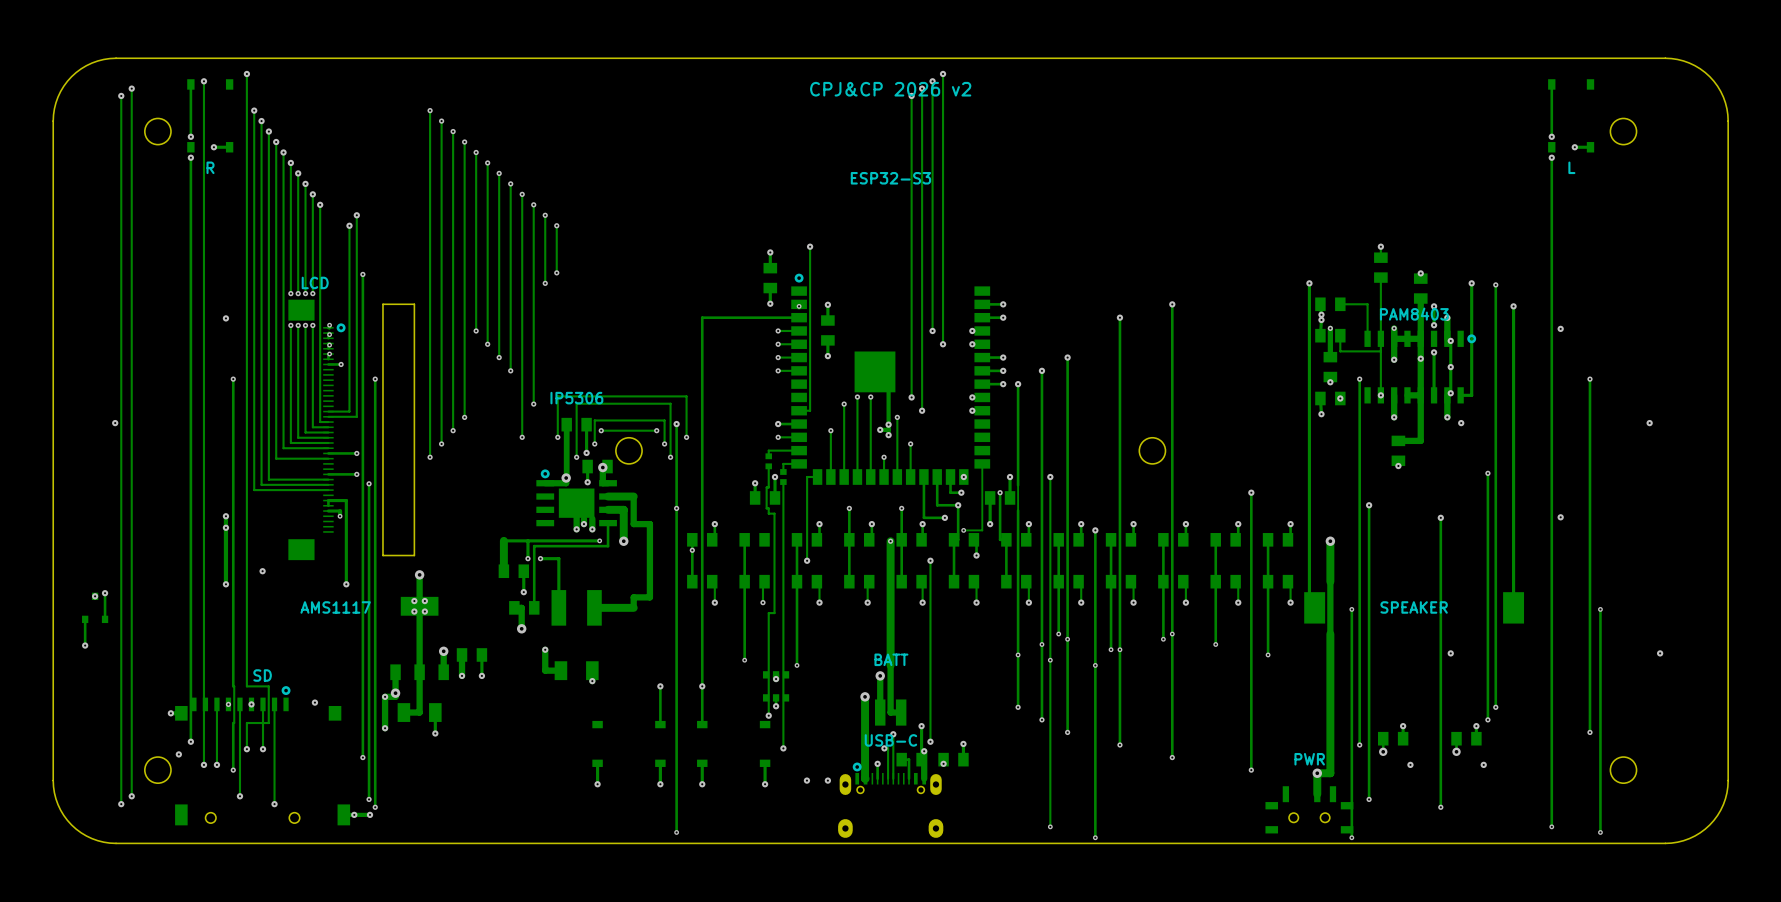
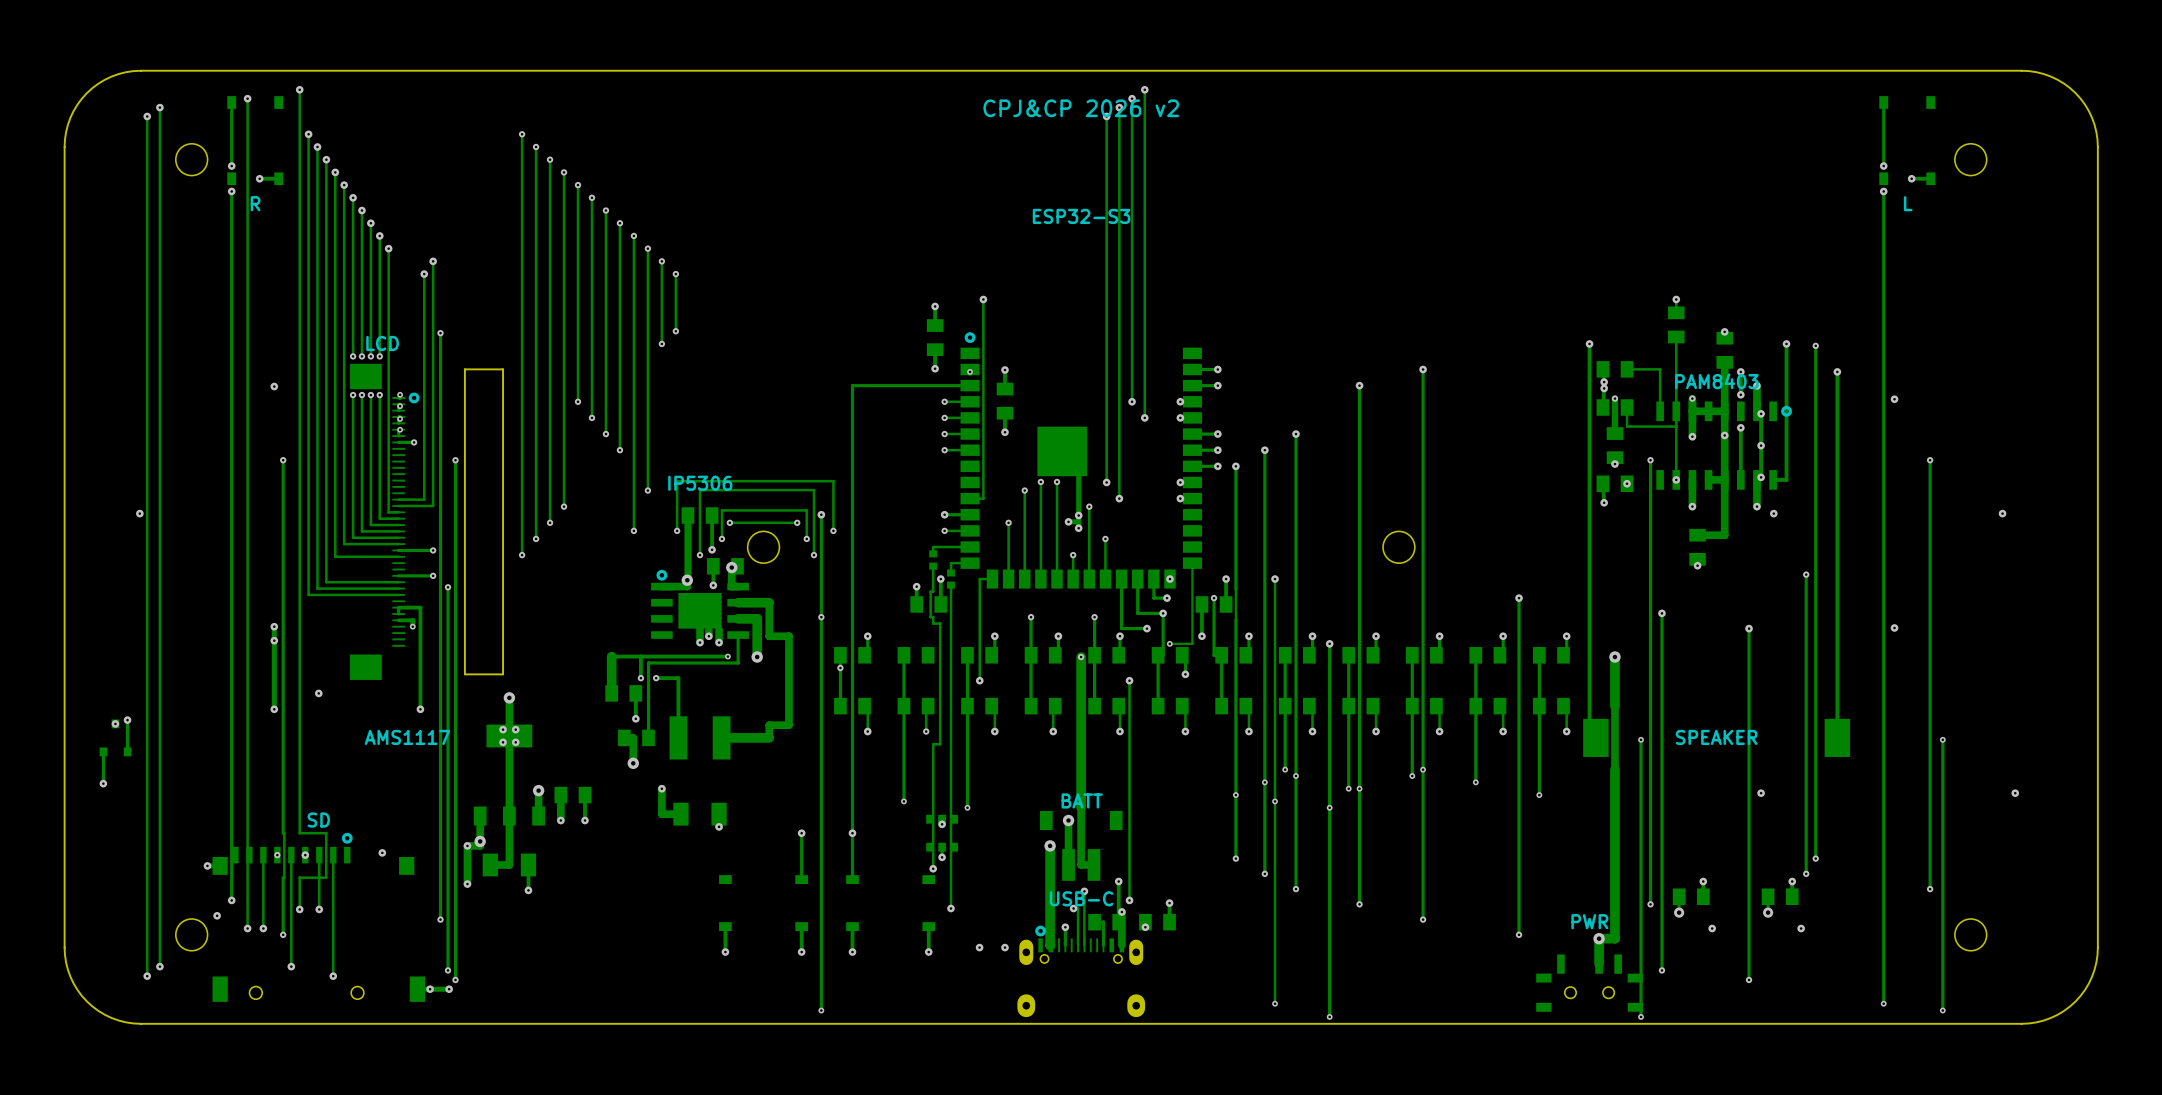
part: none -> (1081, 845)

